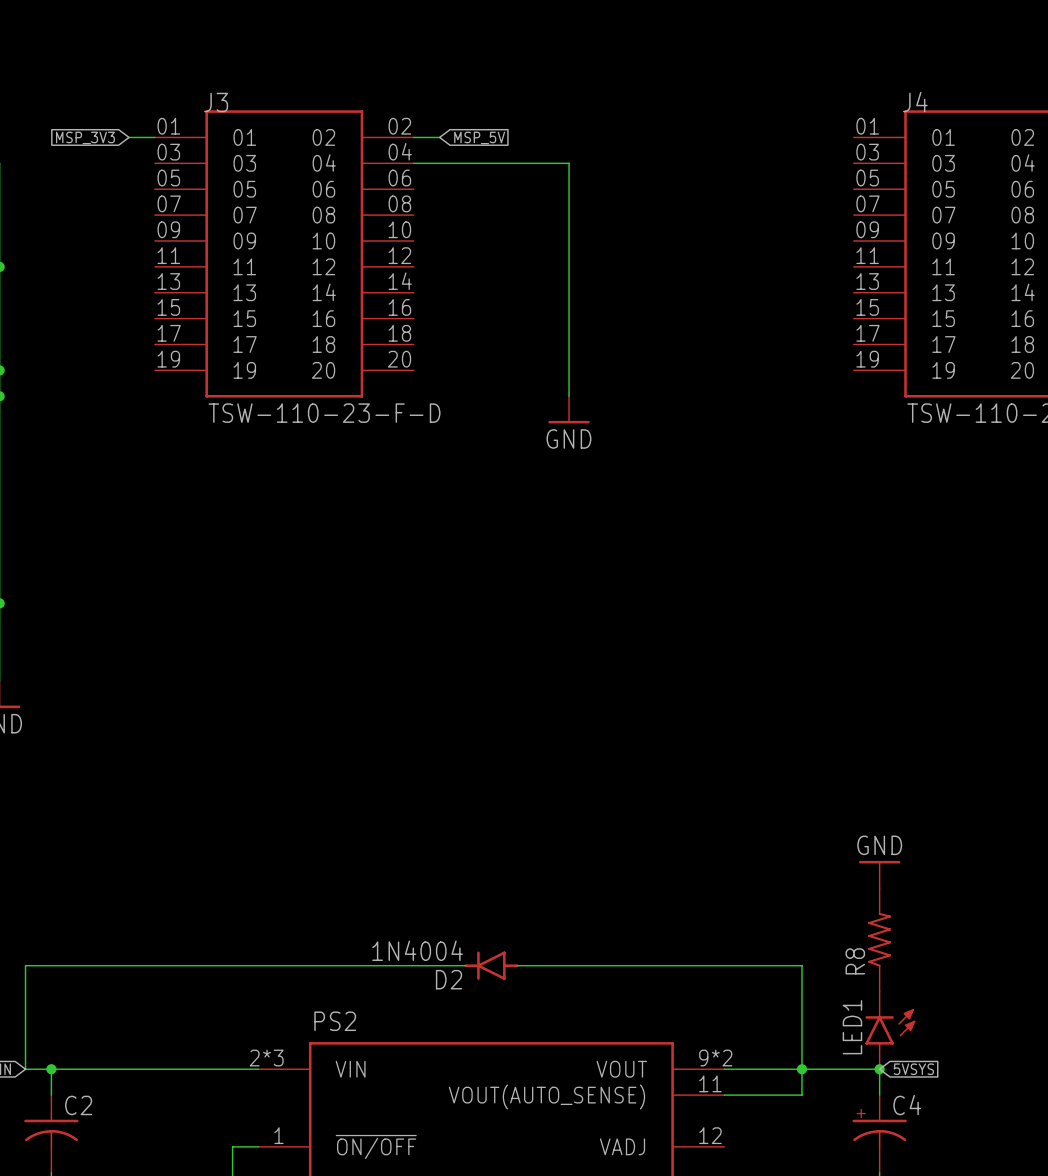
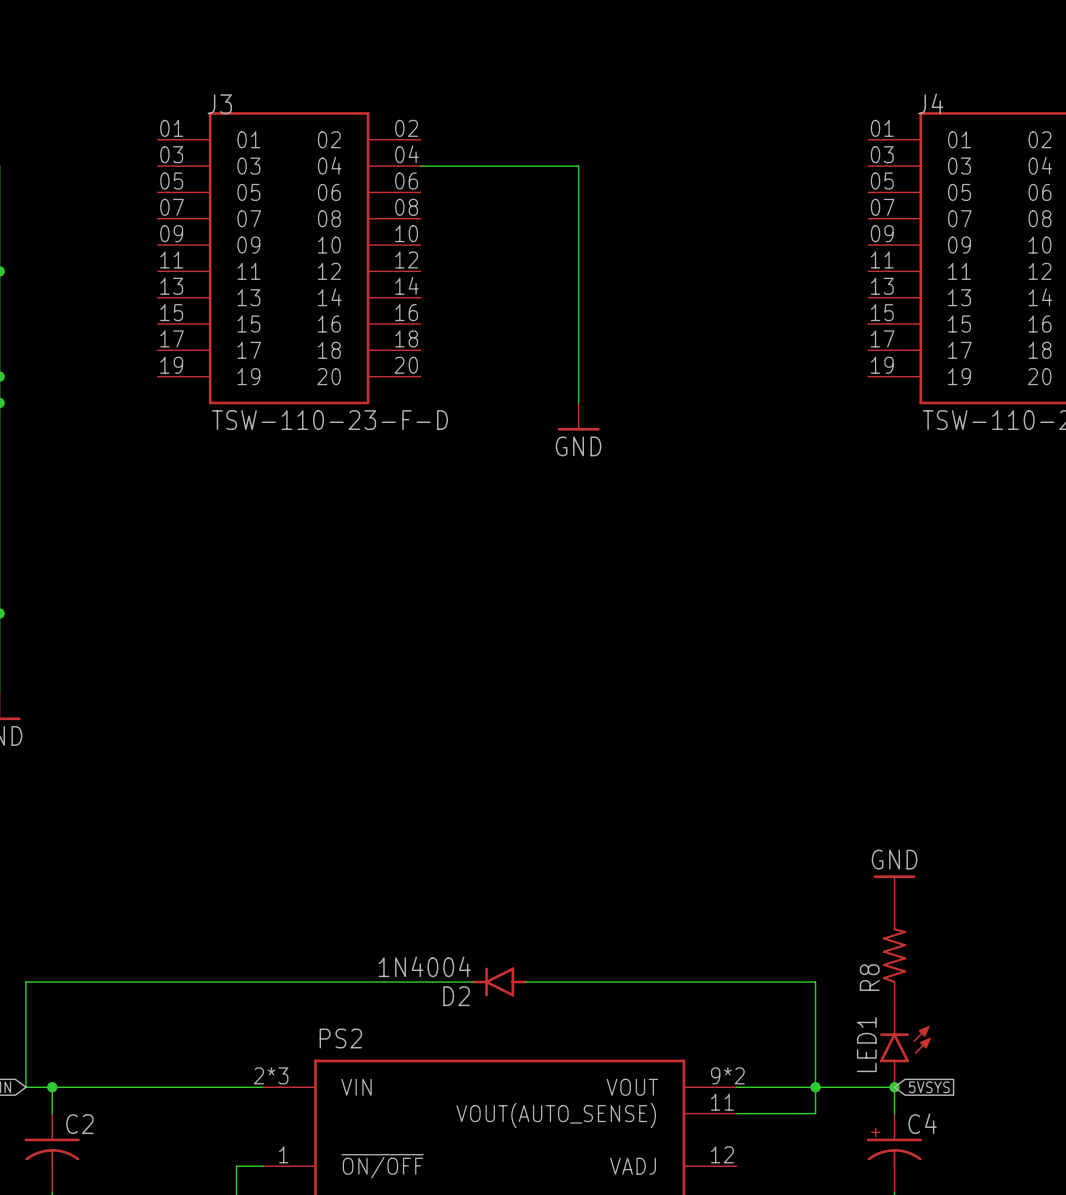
global label: MSP_3V3 (85, 137) -> none
wire: (129, 137) (154, 137) -> none
wire: (413, 137) (439, 137) -> none
global label: MSP_5V (479, 137) -> none

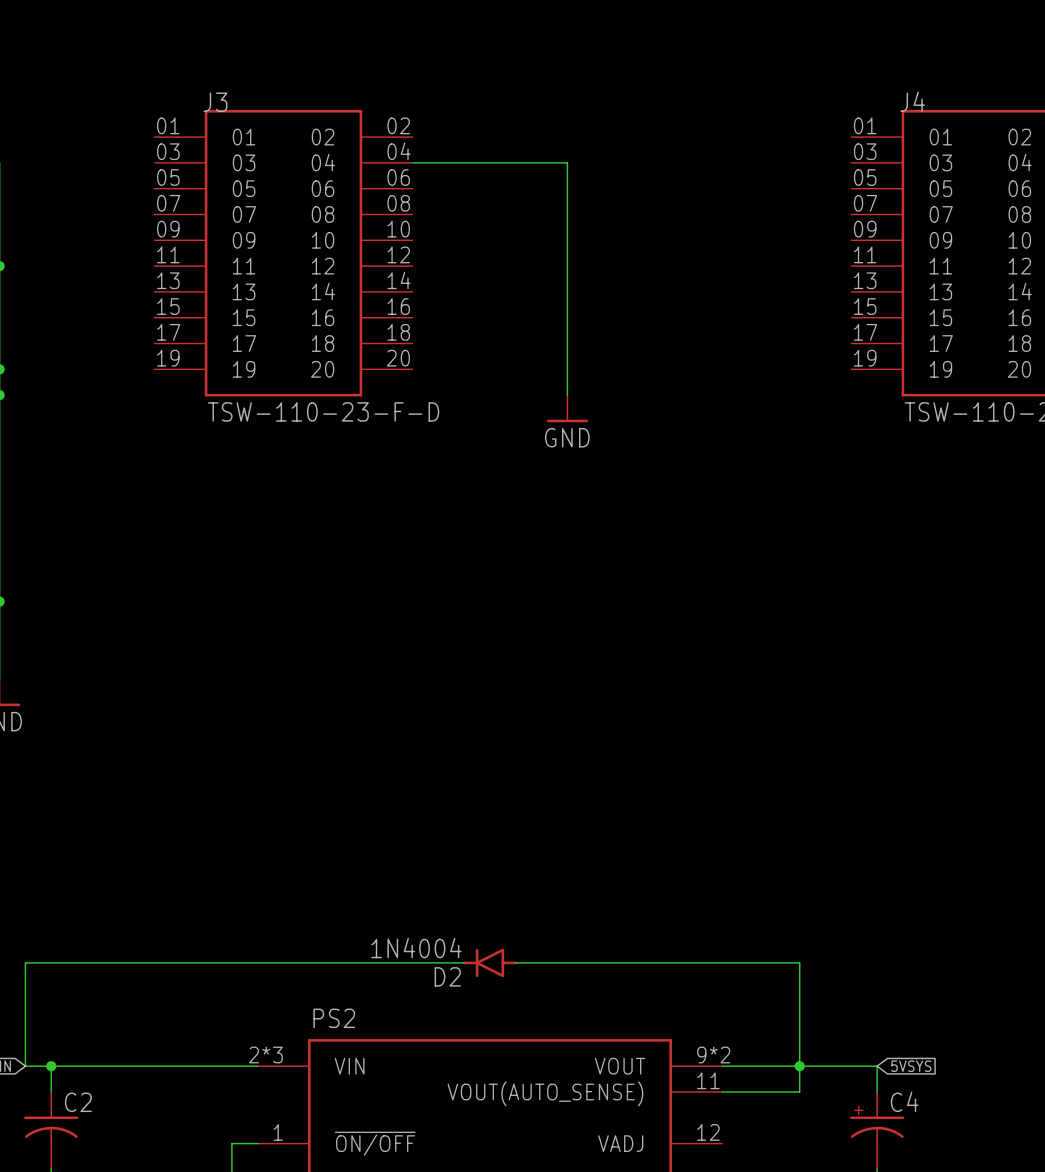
power symbol: GND (894, 889) -> none
R8: (894, 955) -> none
LED1: (905, 1047) -> none
junction: (894, 1087) -> none

